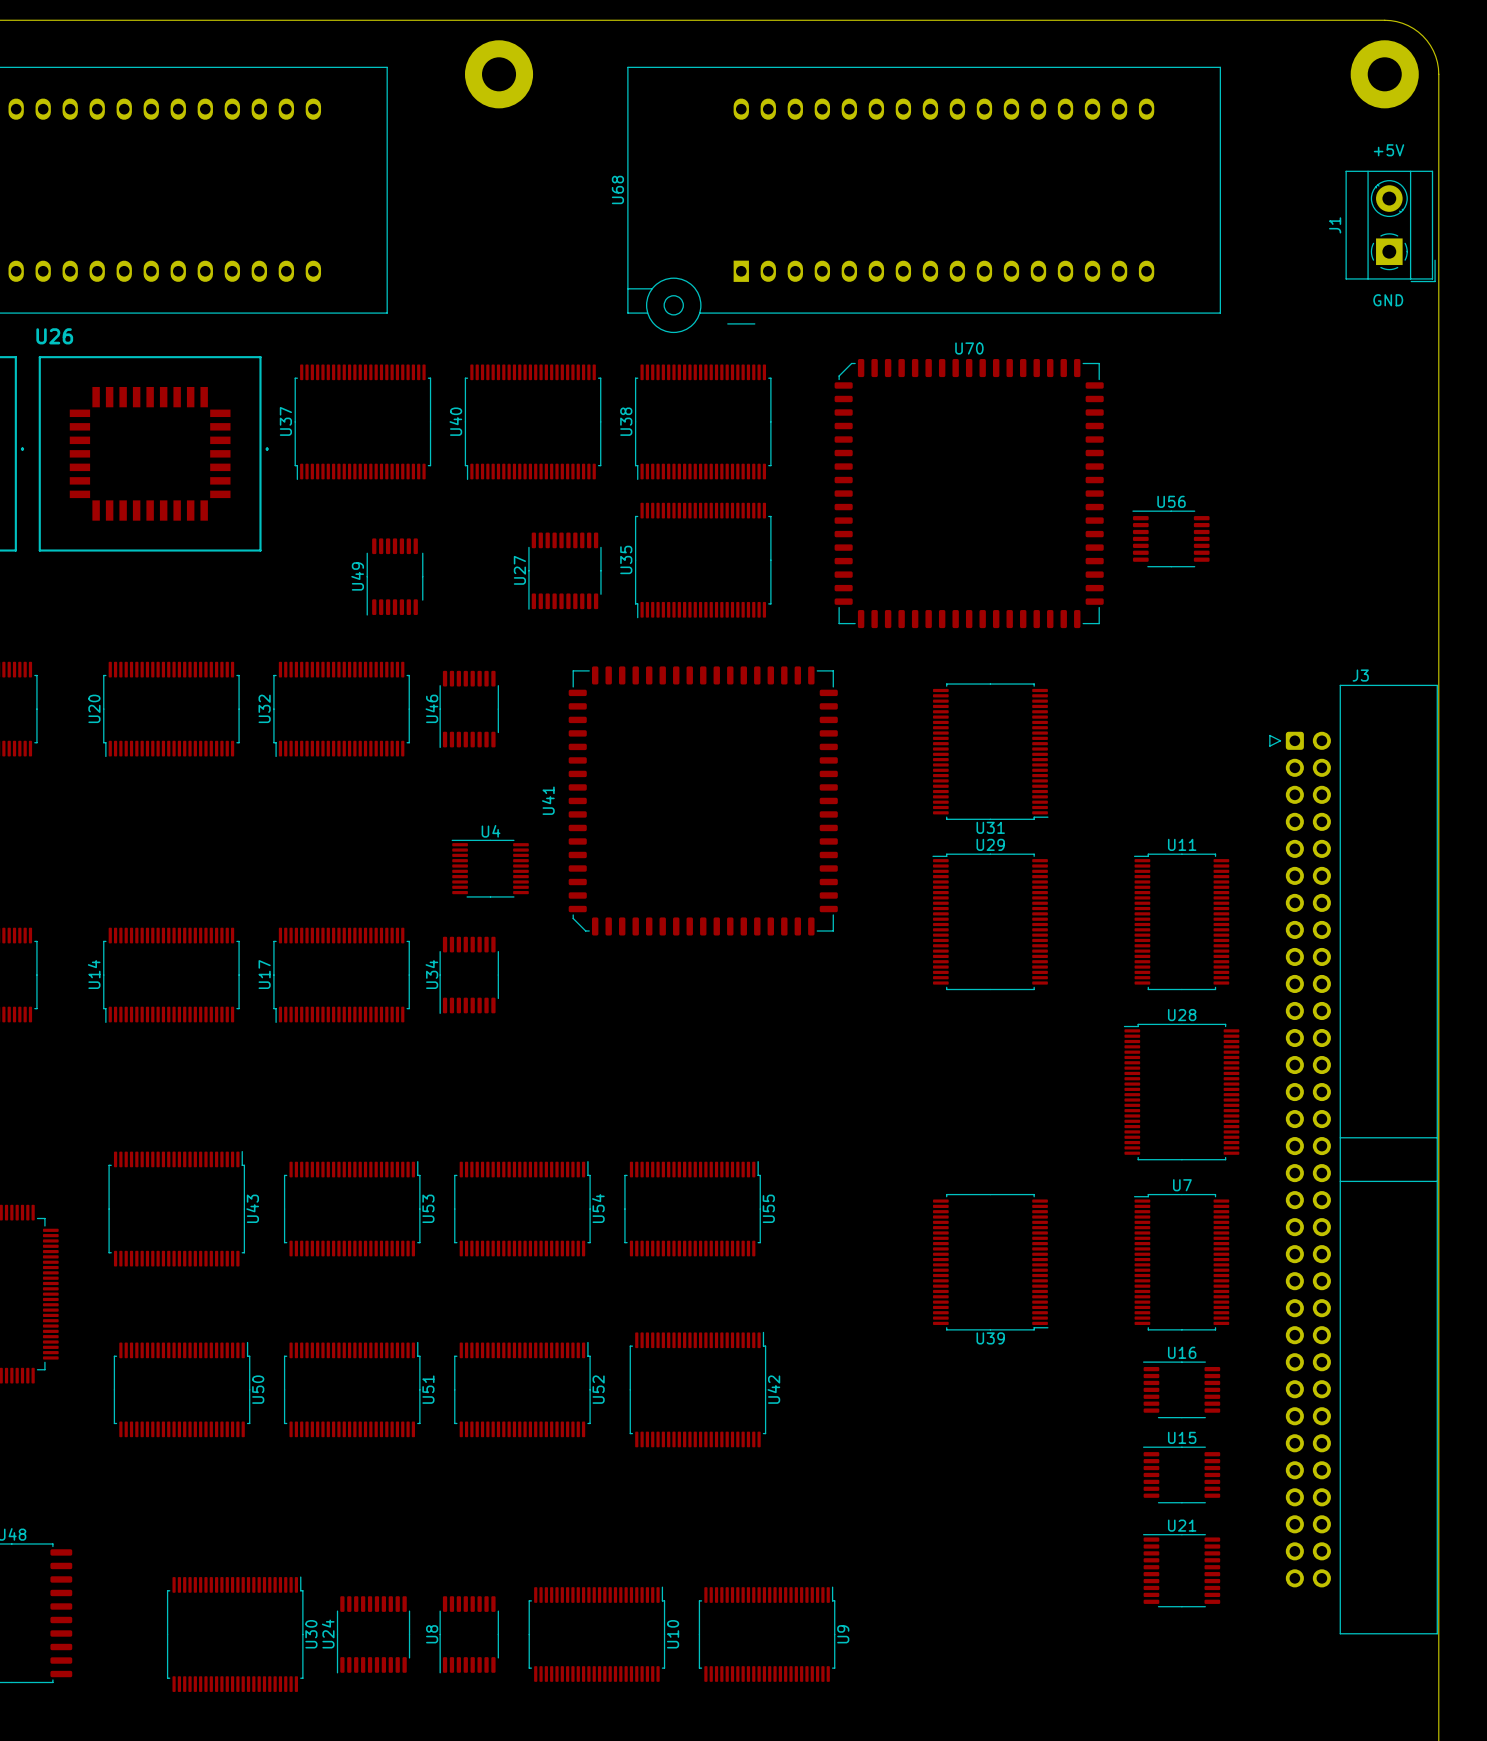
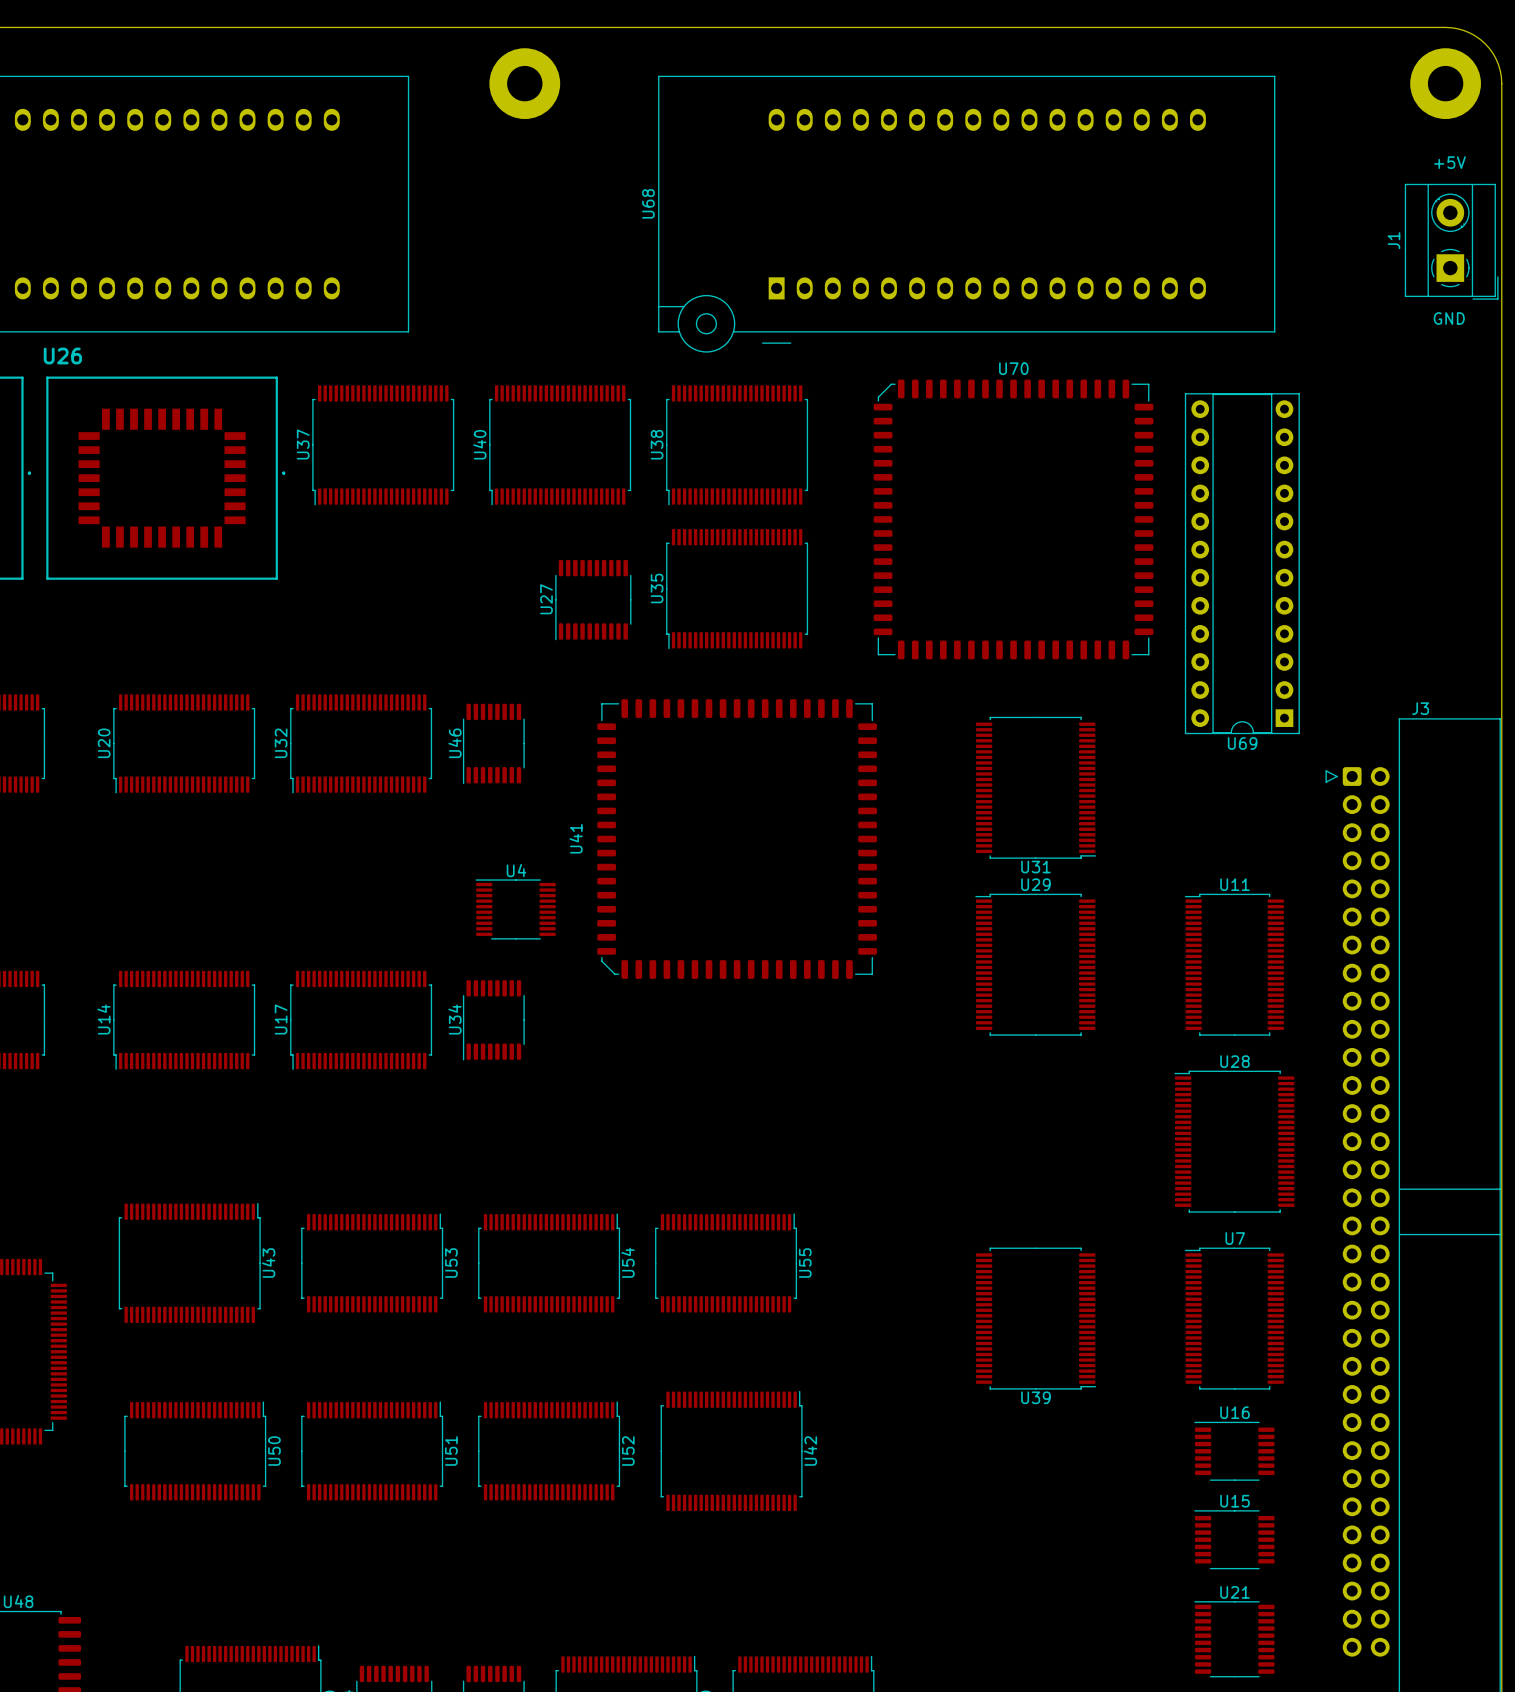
U69: none -> (1242, 563)
U56: (1170, 538) -> none
U49: (395, 577) -> none

